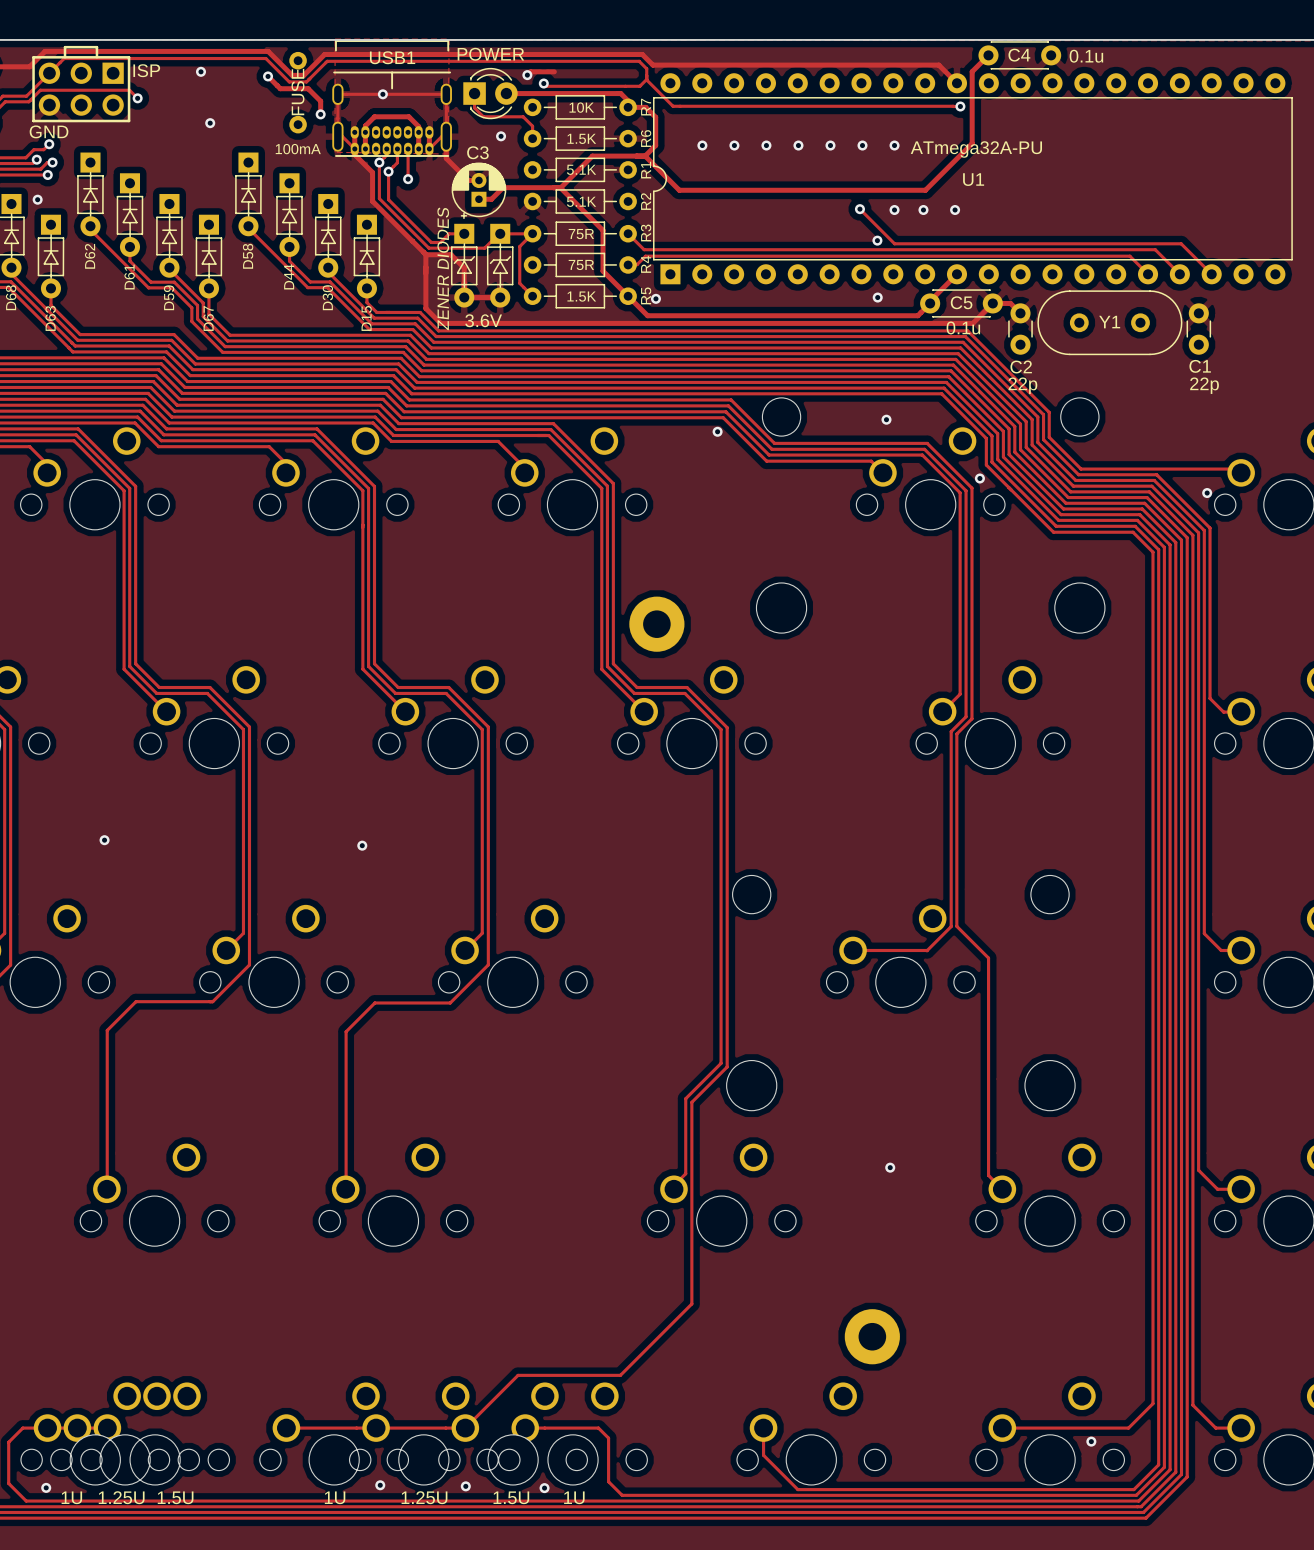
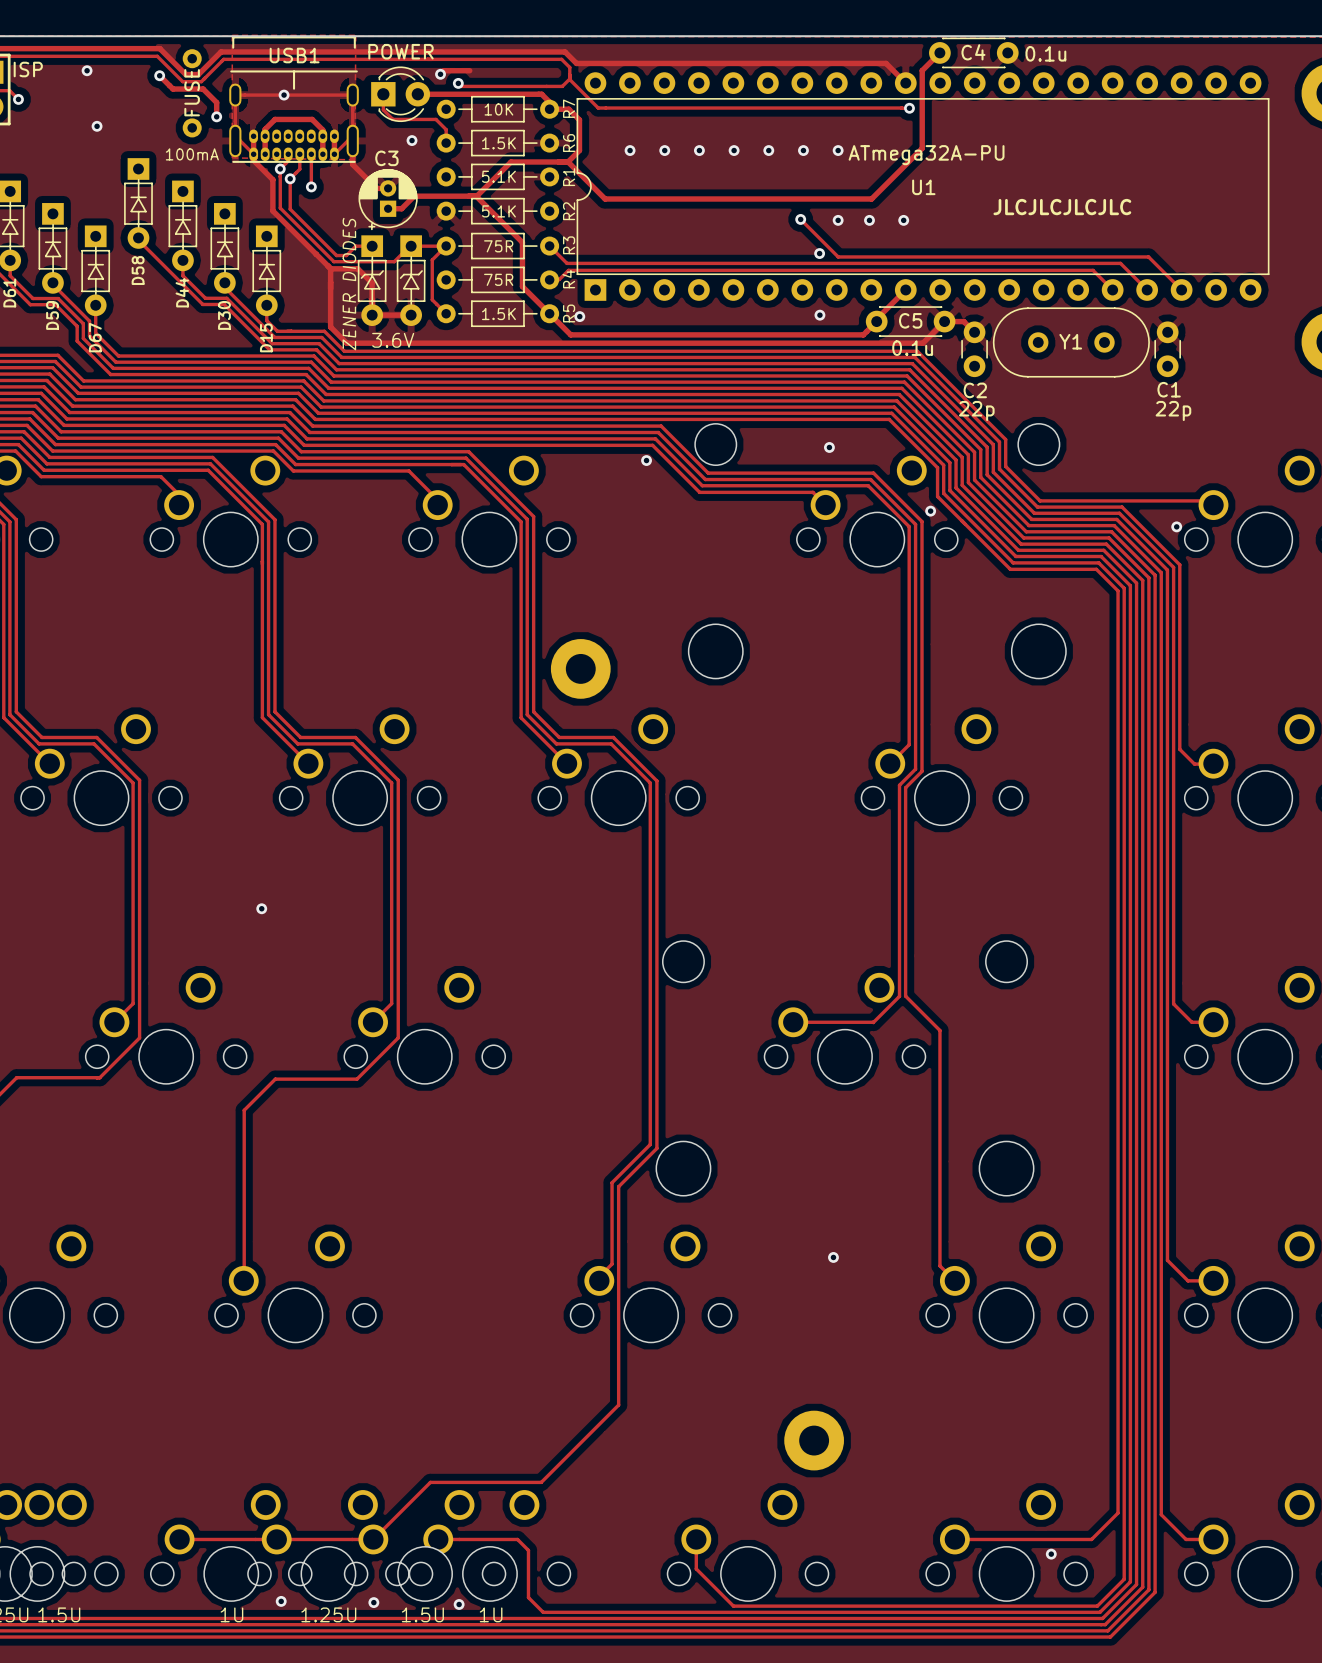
text: none -> JLCJLCJLCJLC (1062, 207)

